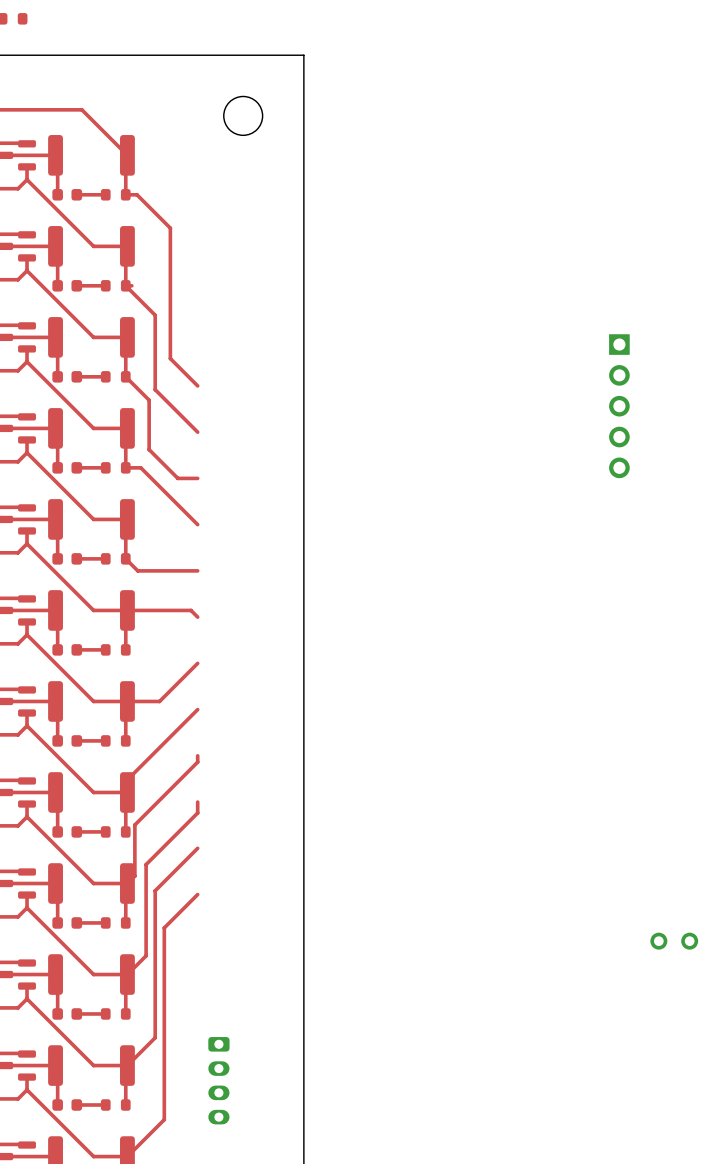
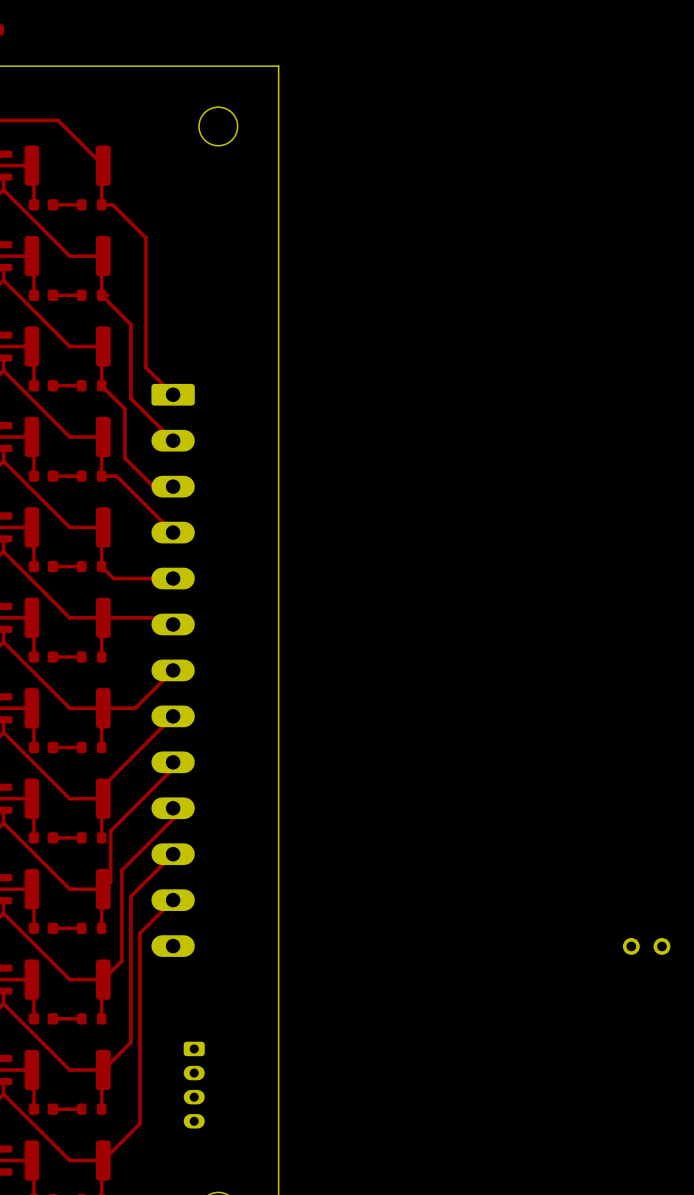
part: (619, 406) -> none
part: none -> (173, 670)

